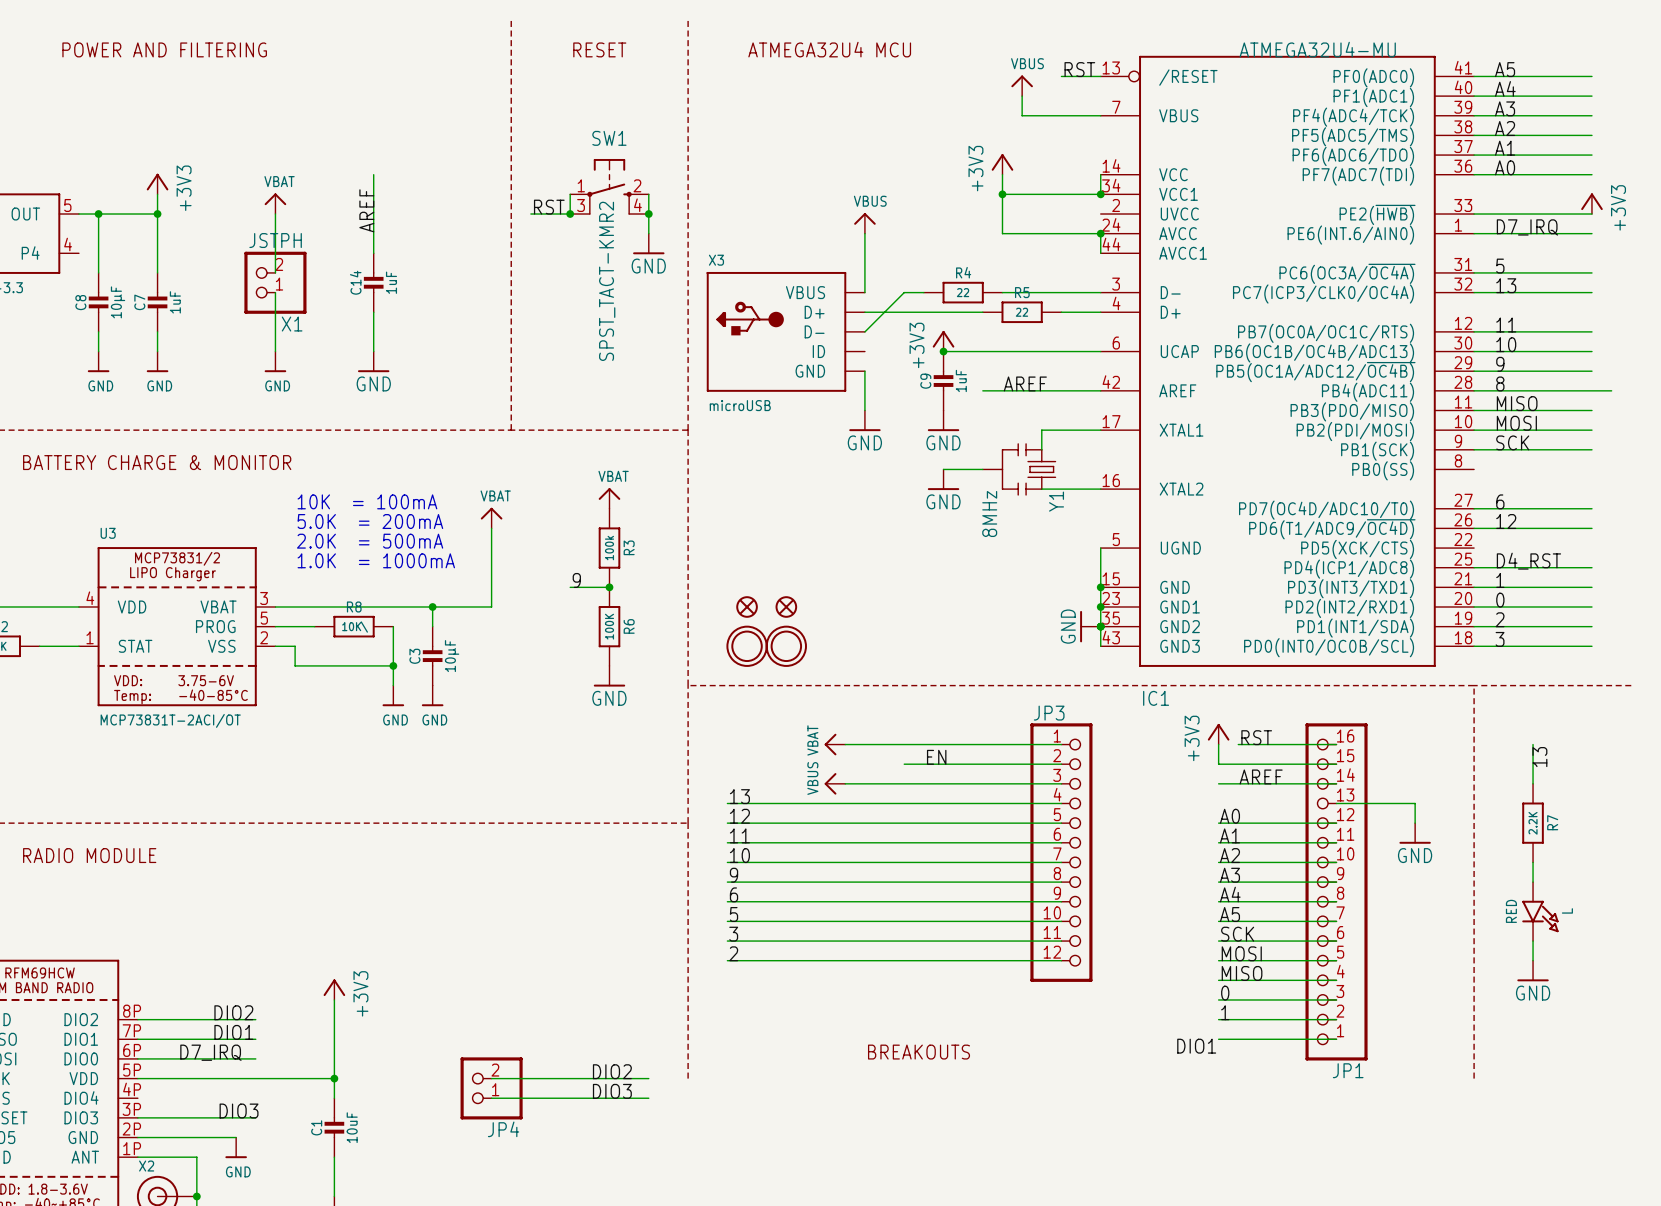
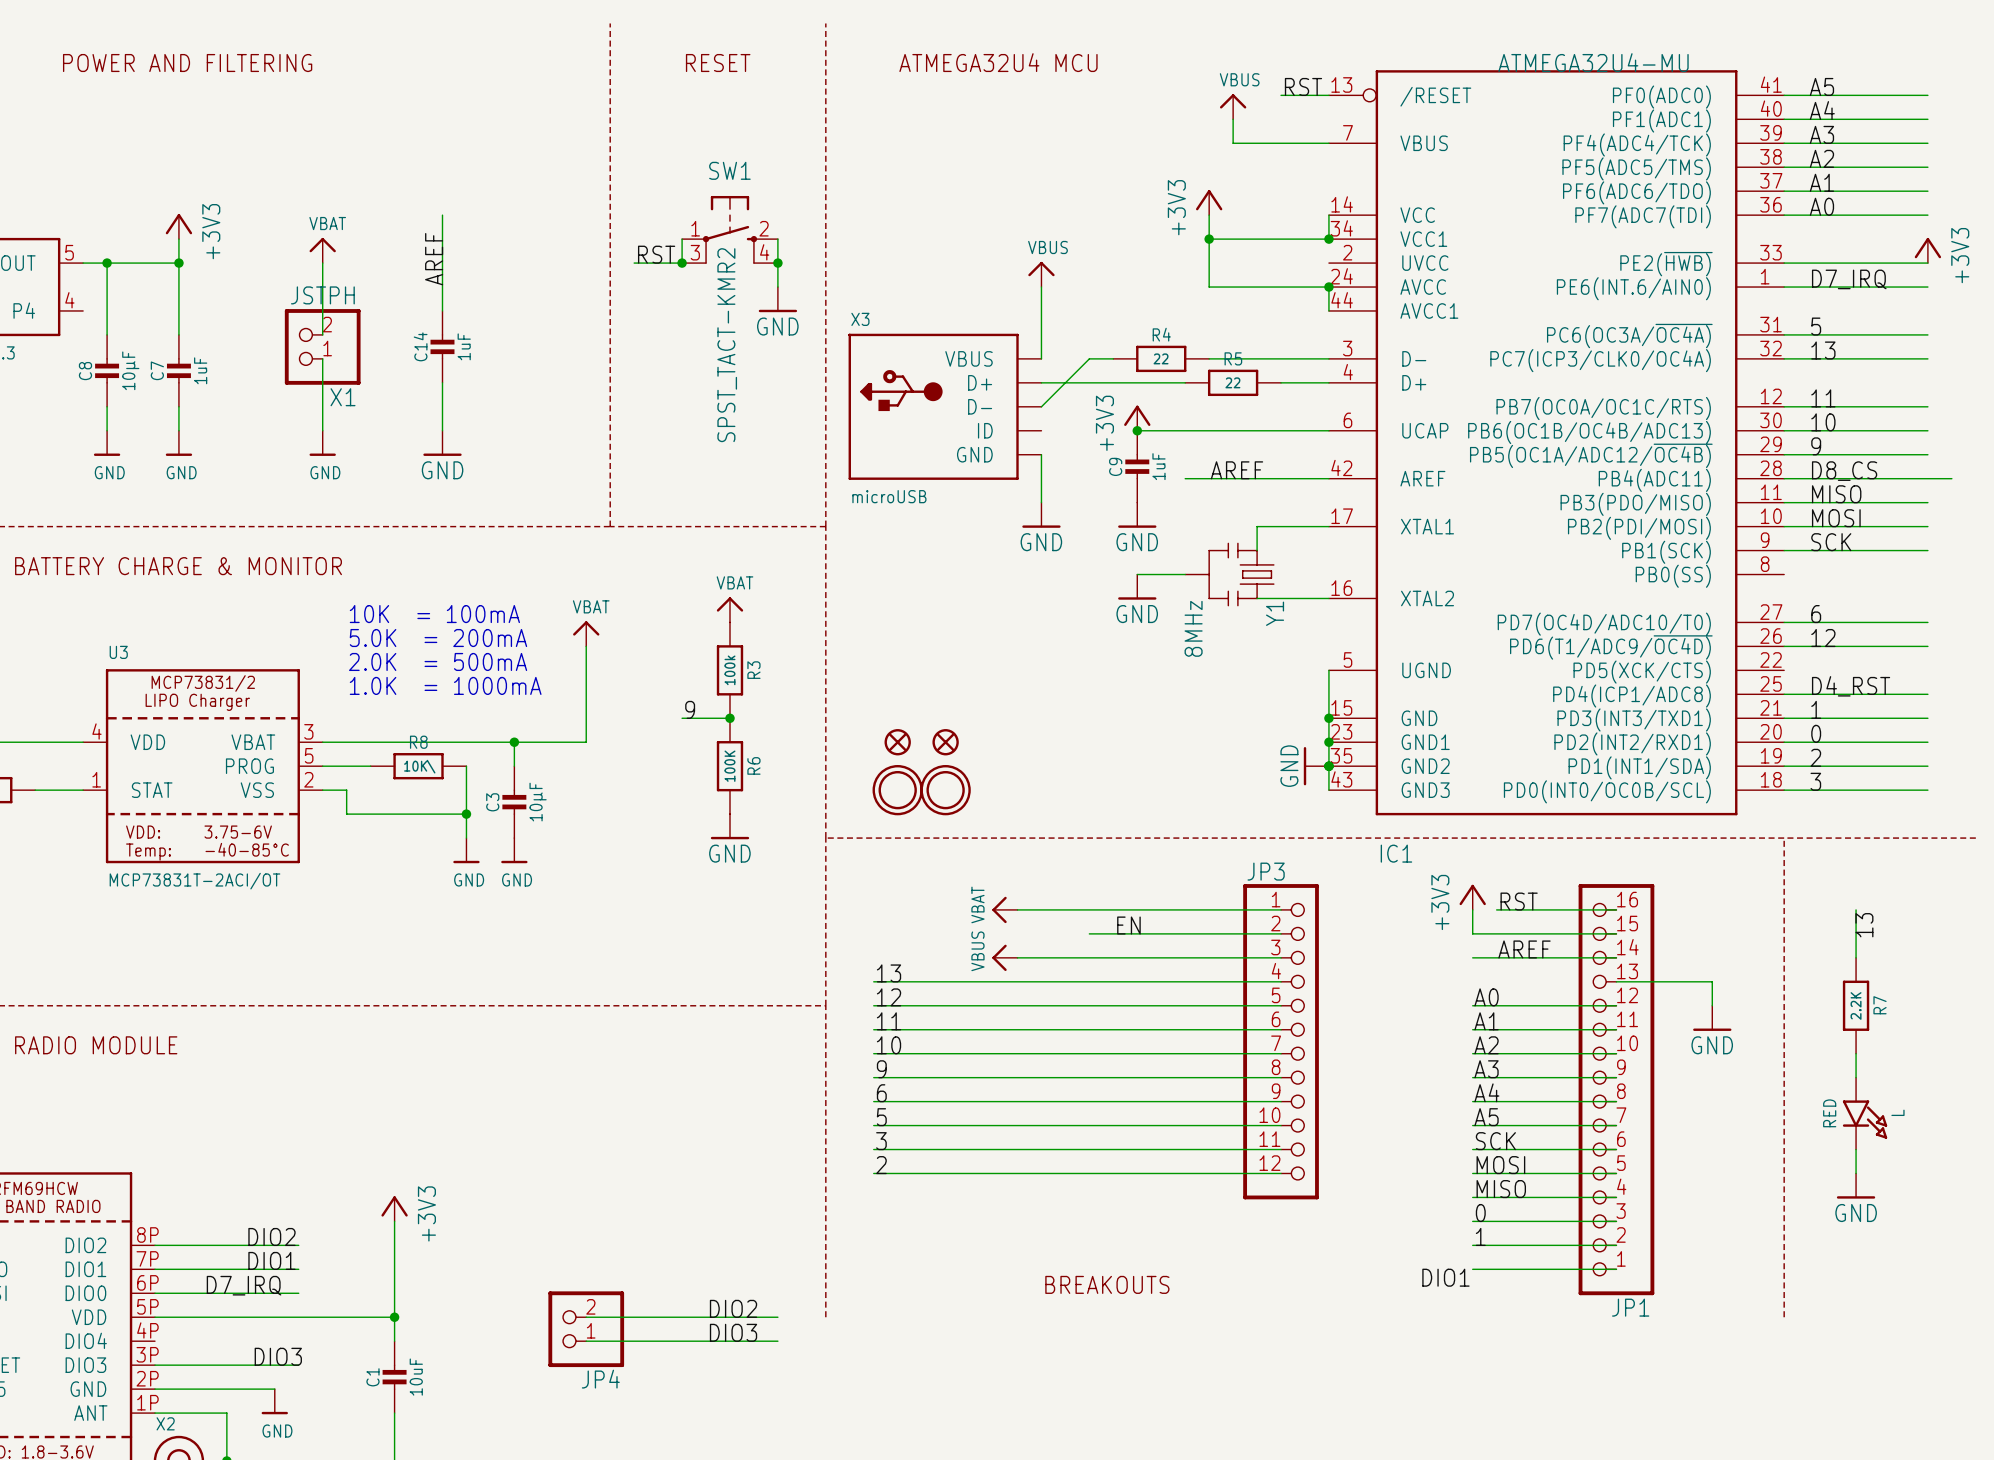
label: 8 (1500, 383) -> D8_CS (1844, 471)

